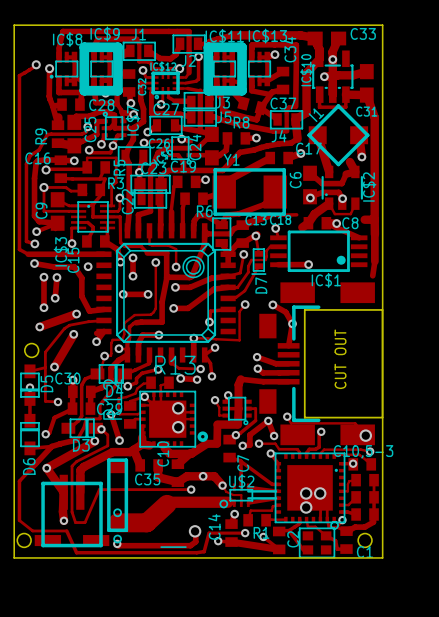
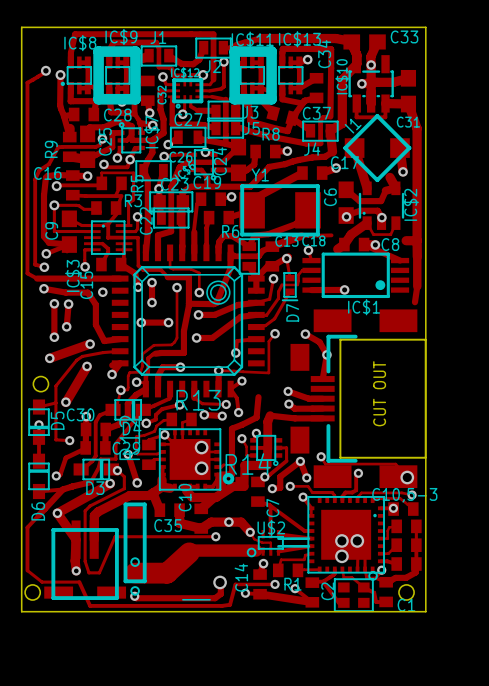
track: none -> (258, 397) (256, 417) (231, 428) (231, 474) (217, 474) (217, 479) (212, 486) (205, 486)
track: none -> (223, 464) (217, 467)
R14: none -> (230, 483)
track: none -> (190, 486) (197, 486)

